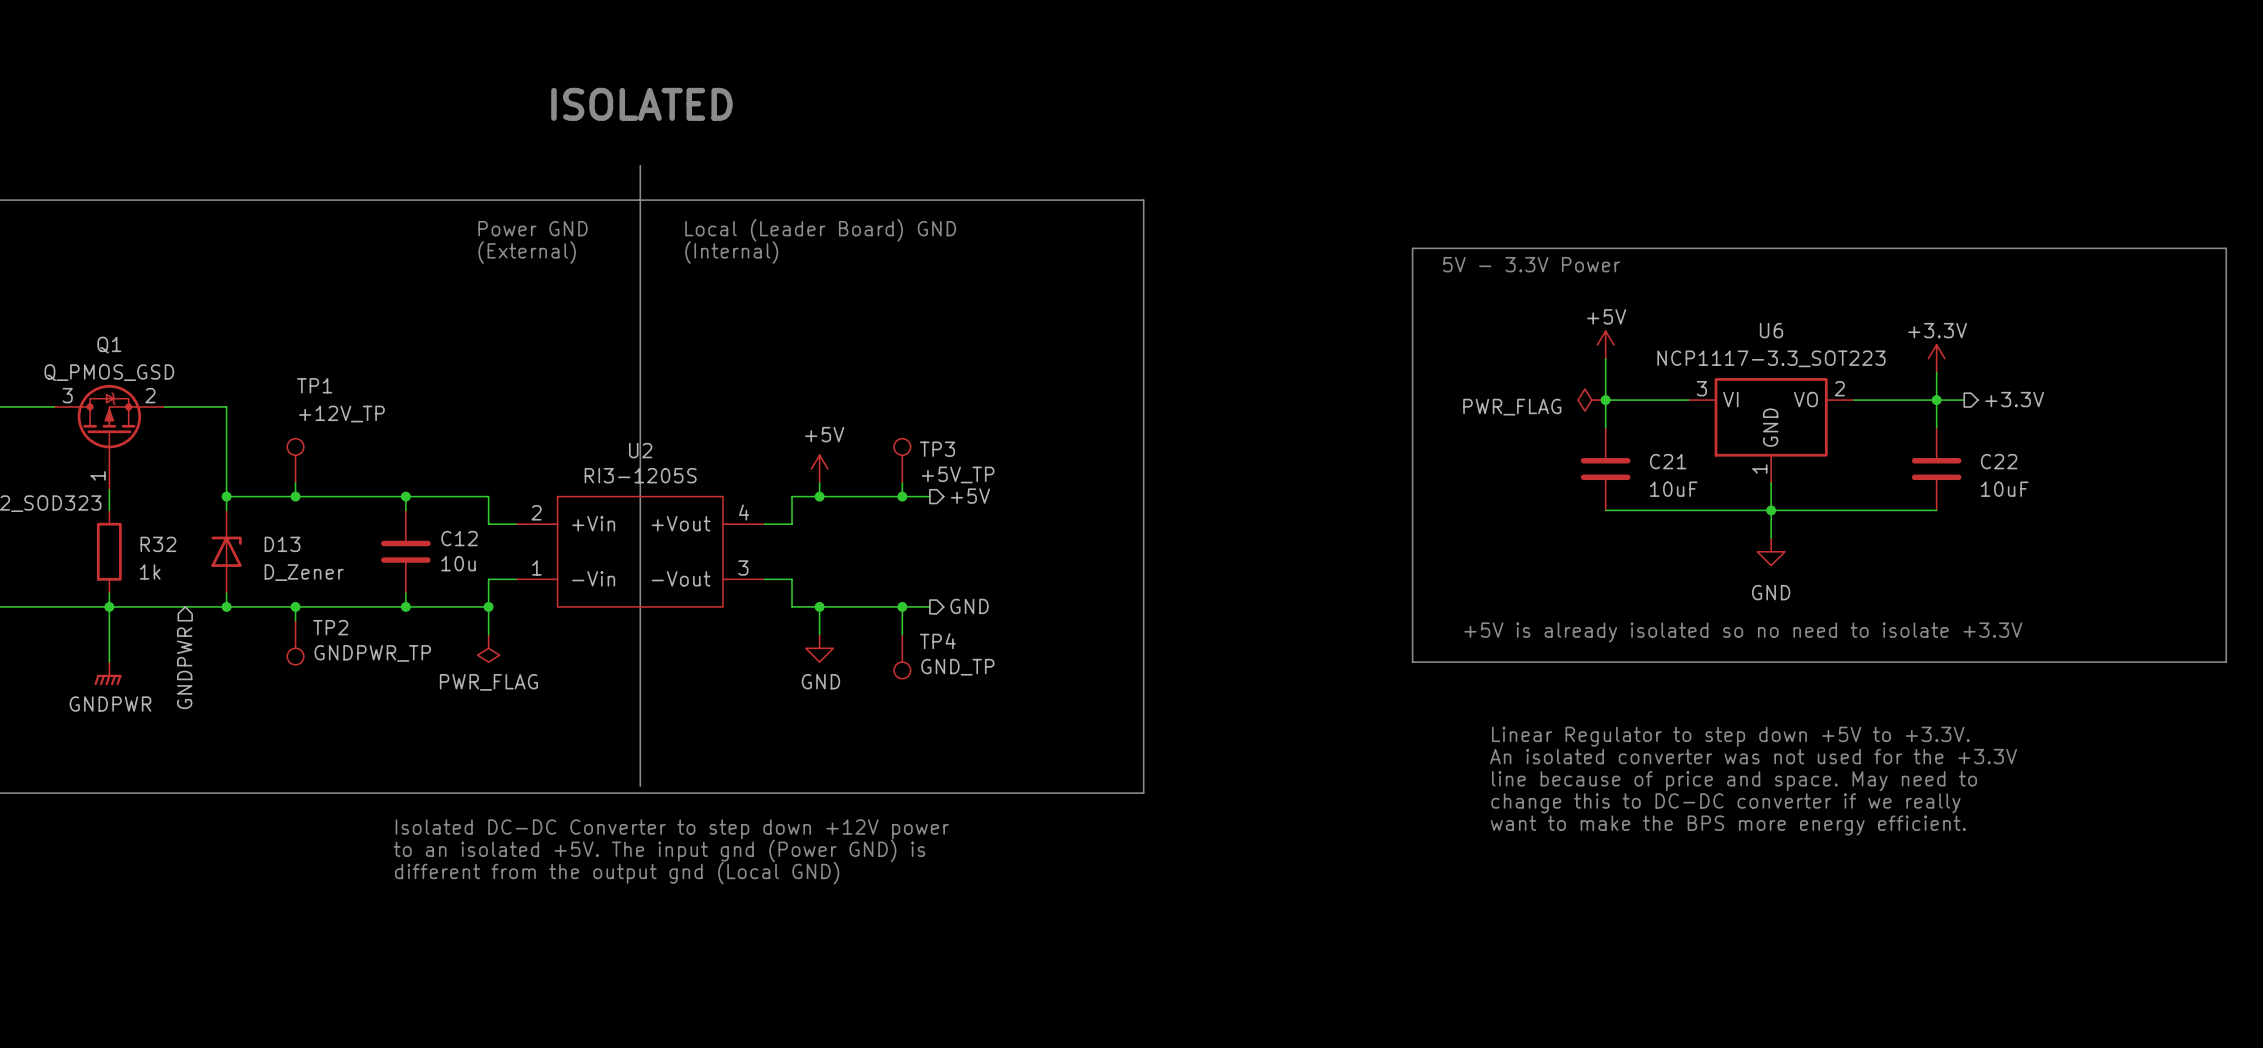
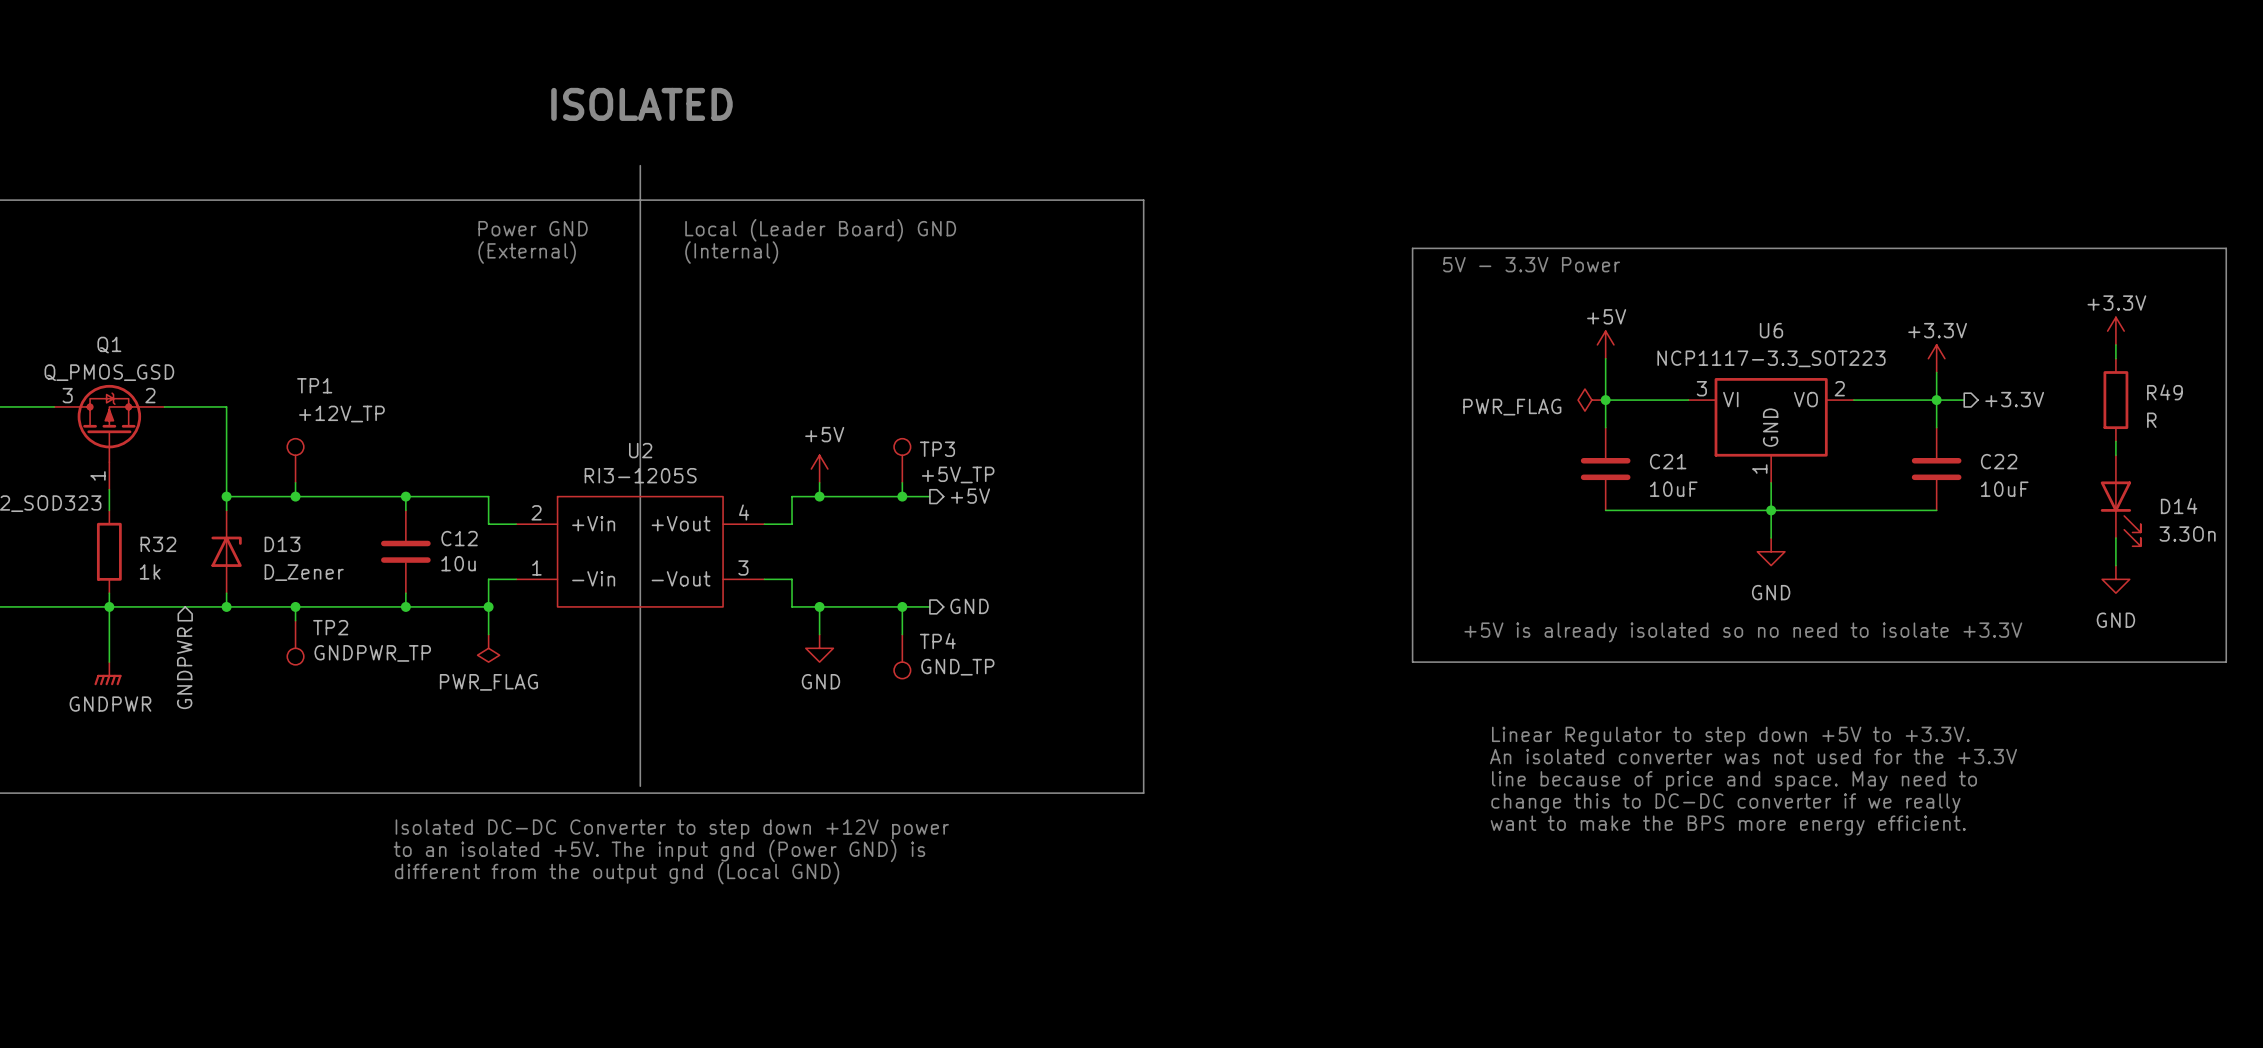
power symbol: none -> +3.3V (2115, 331)
wire: none -> (2115, 344) (2115, 358)
R49: none -> R (2115, 400)
wire: none -> (2115, 441) (2115, 455)
D14: none -> 3.3On (2120, 500)
wire: none -> (2115, 537) (2115, 565)
power symbol: none -> GND (2115, 579)

